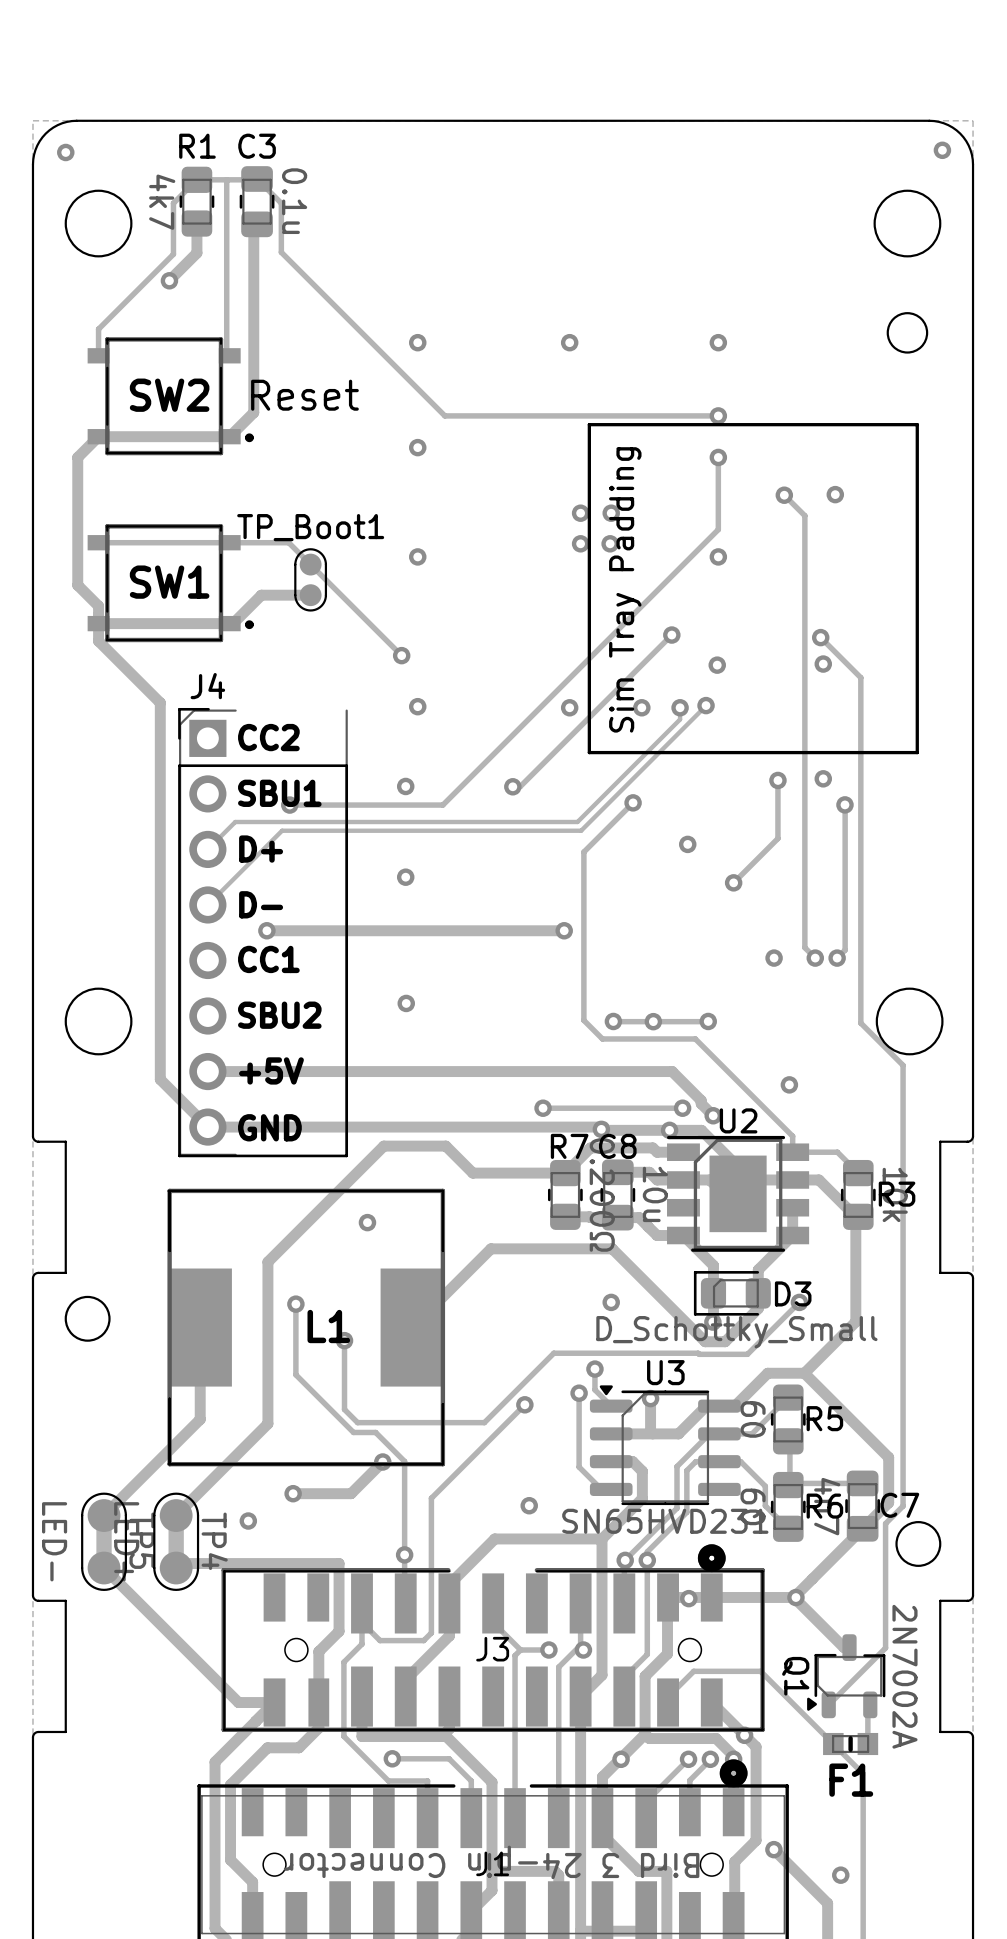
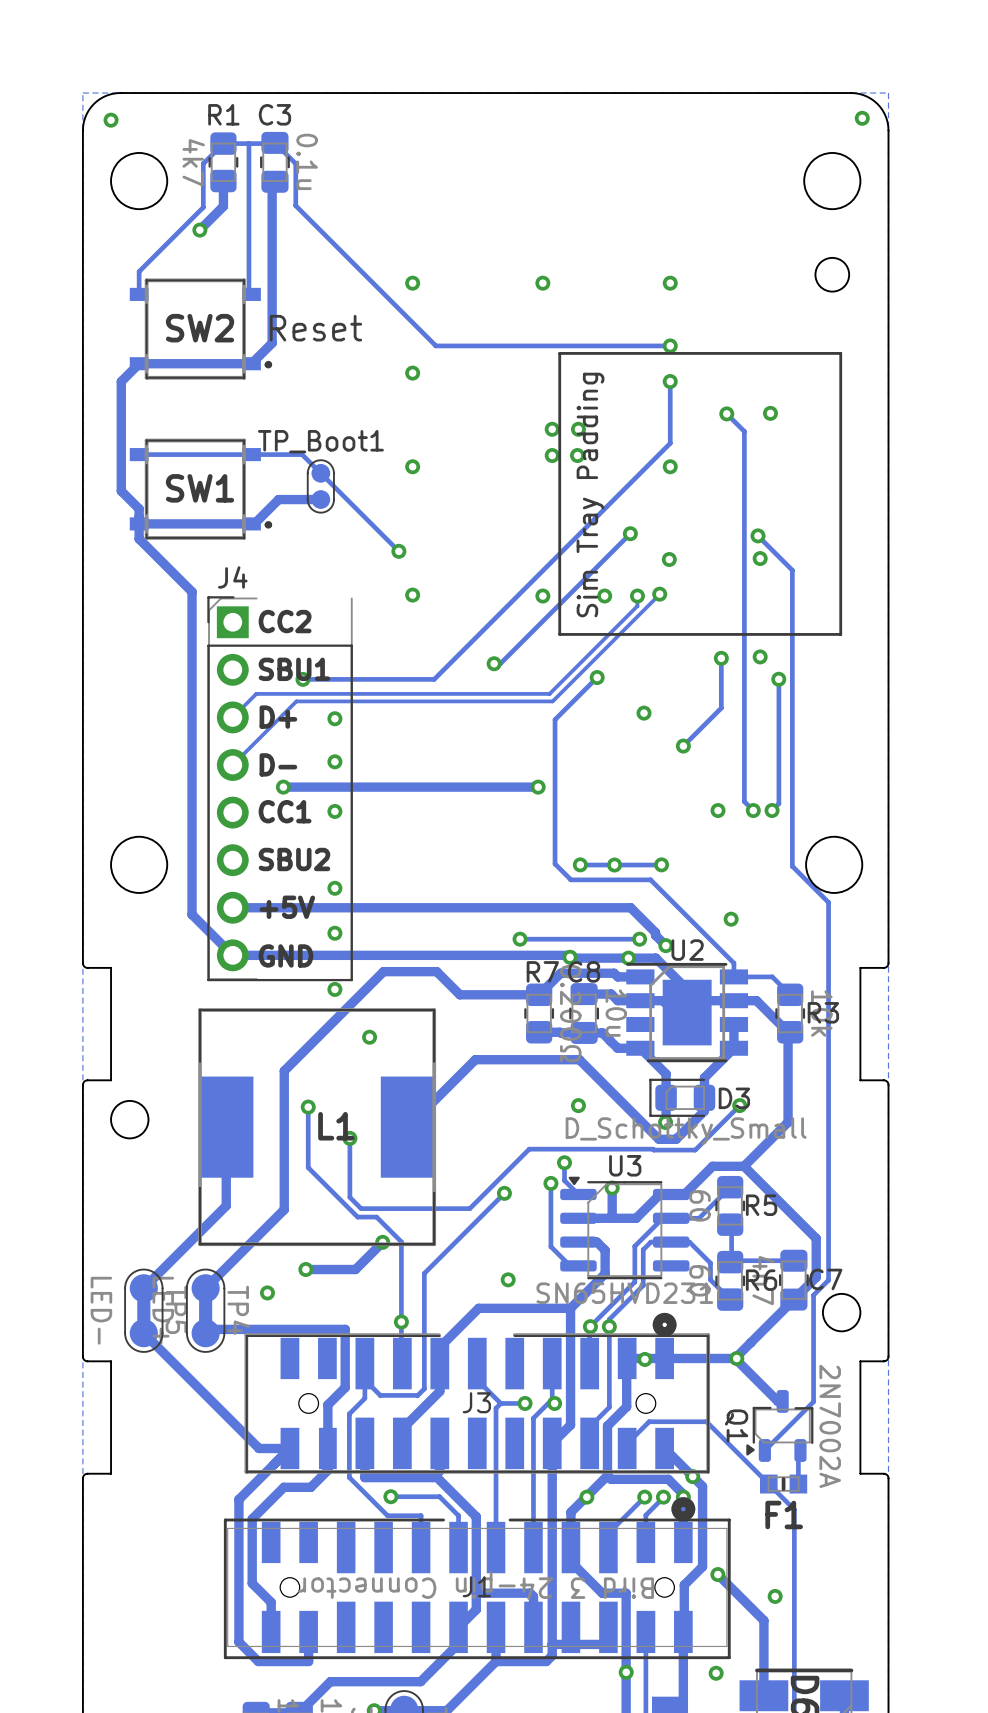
via: (405, 786) -> none
via: none -> (334, 718)
via: (405, 877) -> none
via: none -> (334, 761)
via: none -> (334, 811)
via: (406, 1003) -> none
via: none -> (334, 888)
via: none -> (334, 933)
via: none -> (334, 989)

